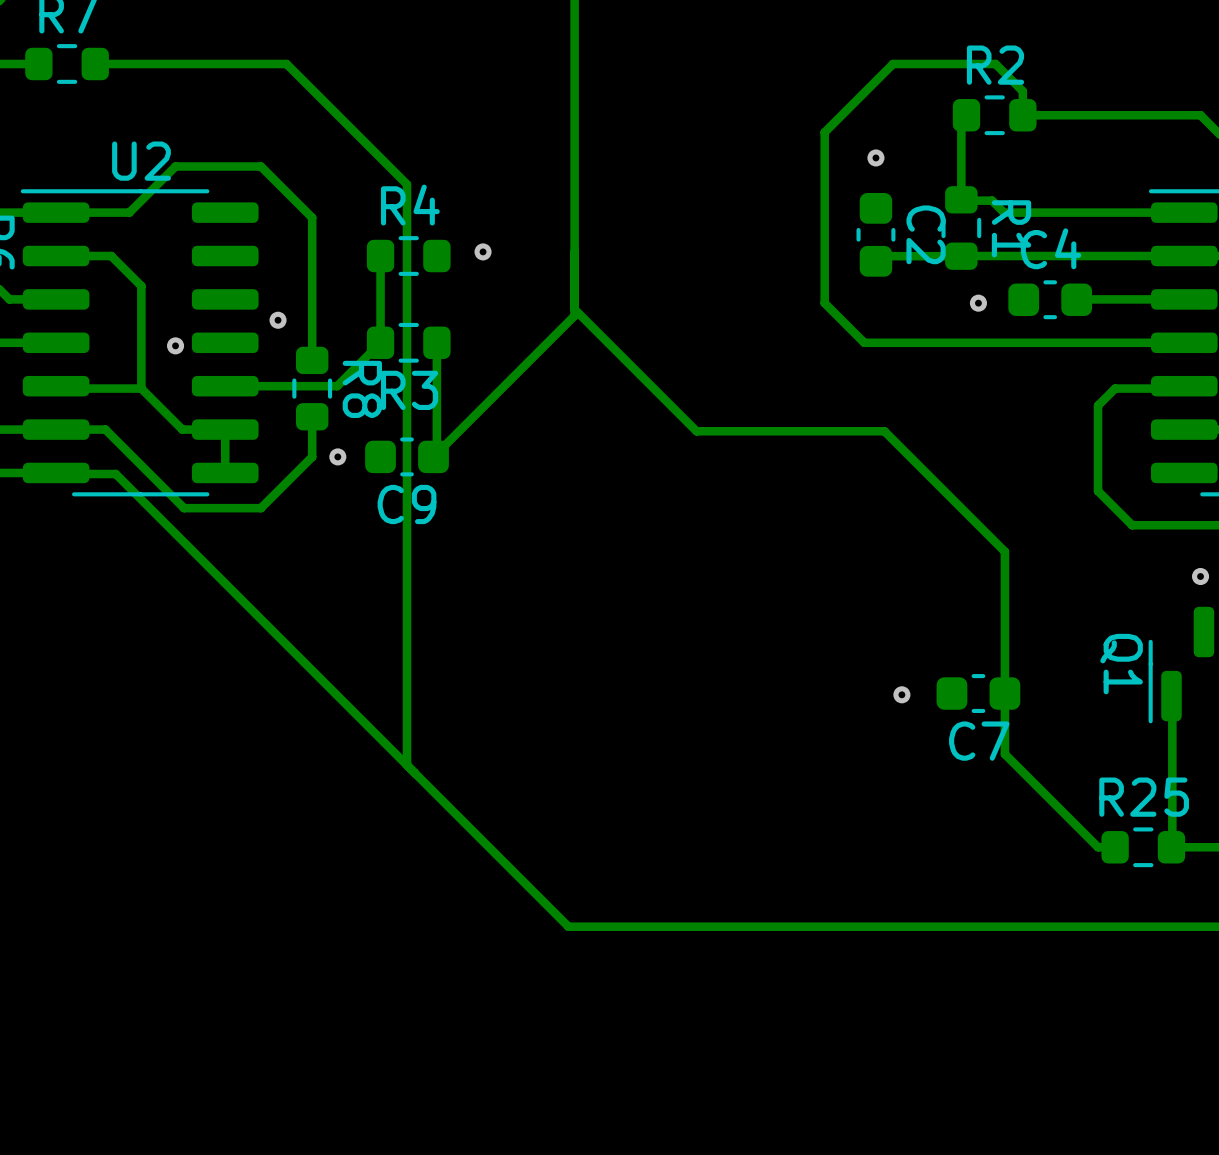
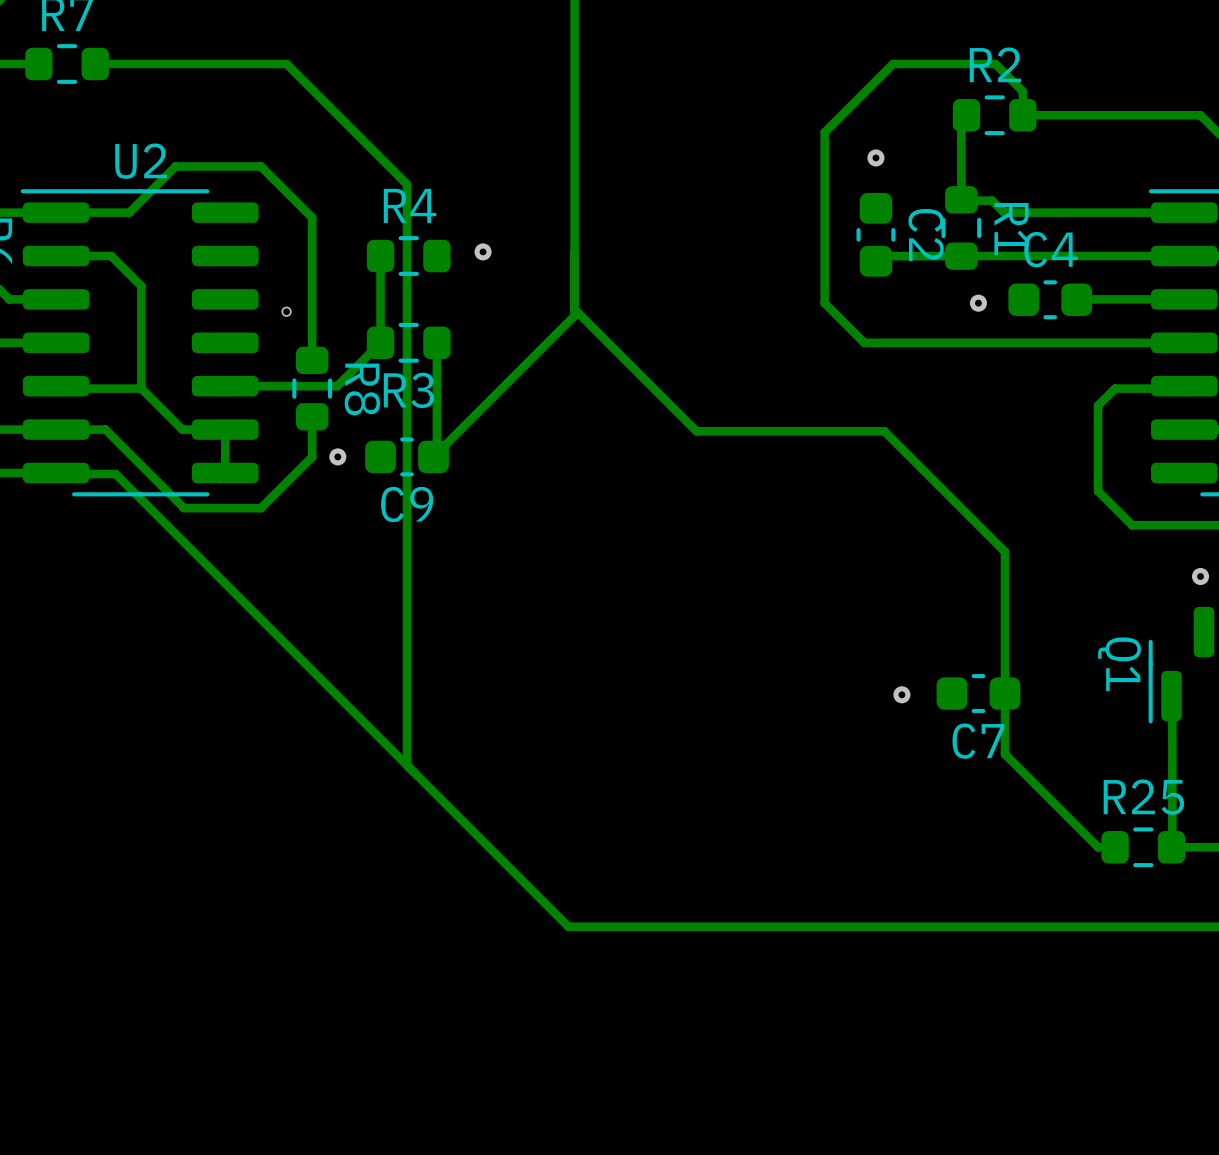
via size: [269, 311, 287, 329] -> [281, 306, 292, 317]
via: (175, 345) -> none

